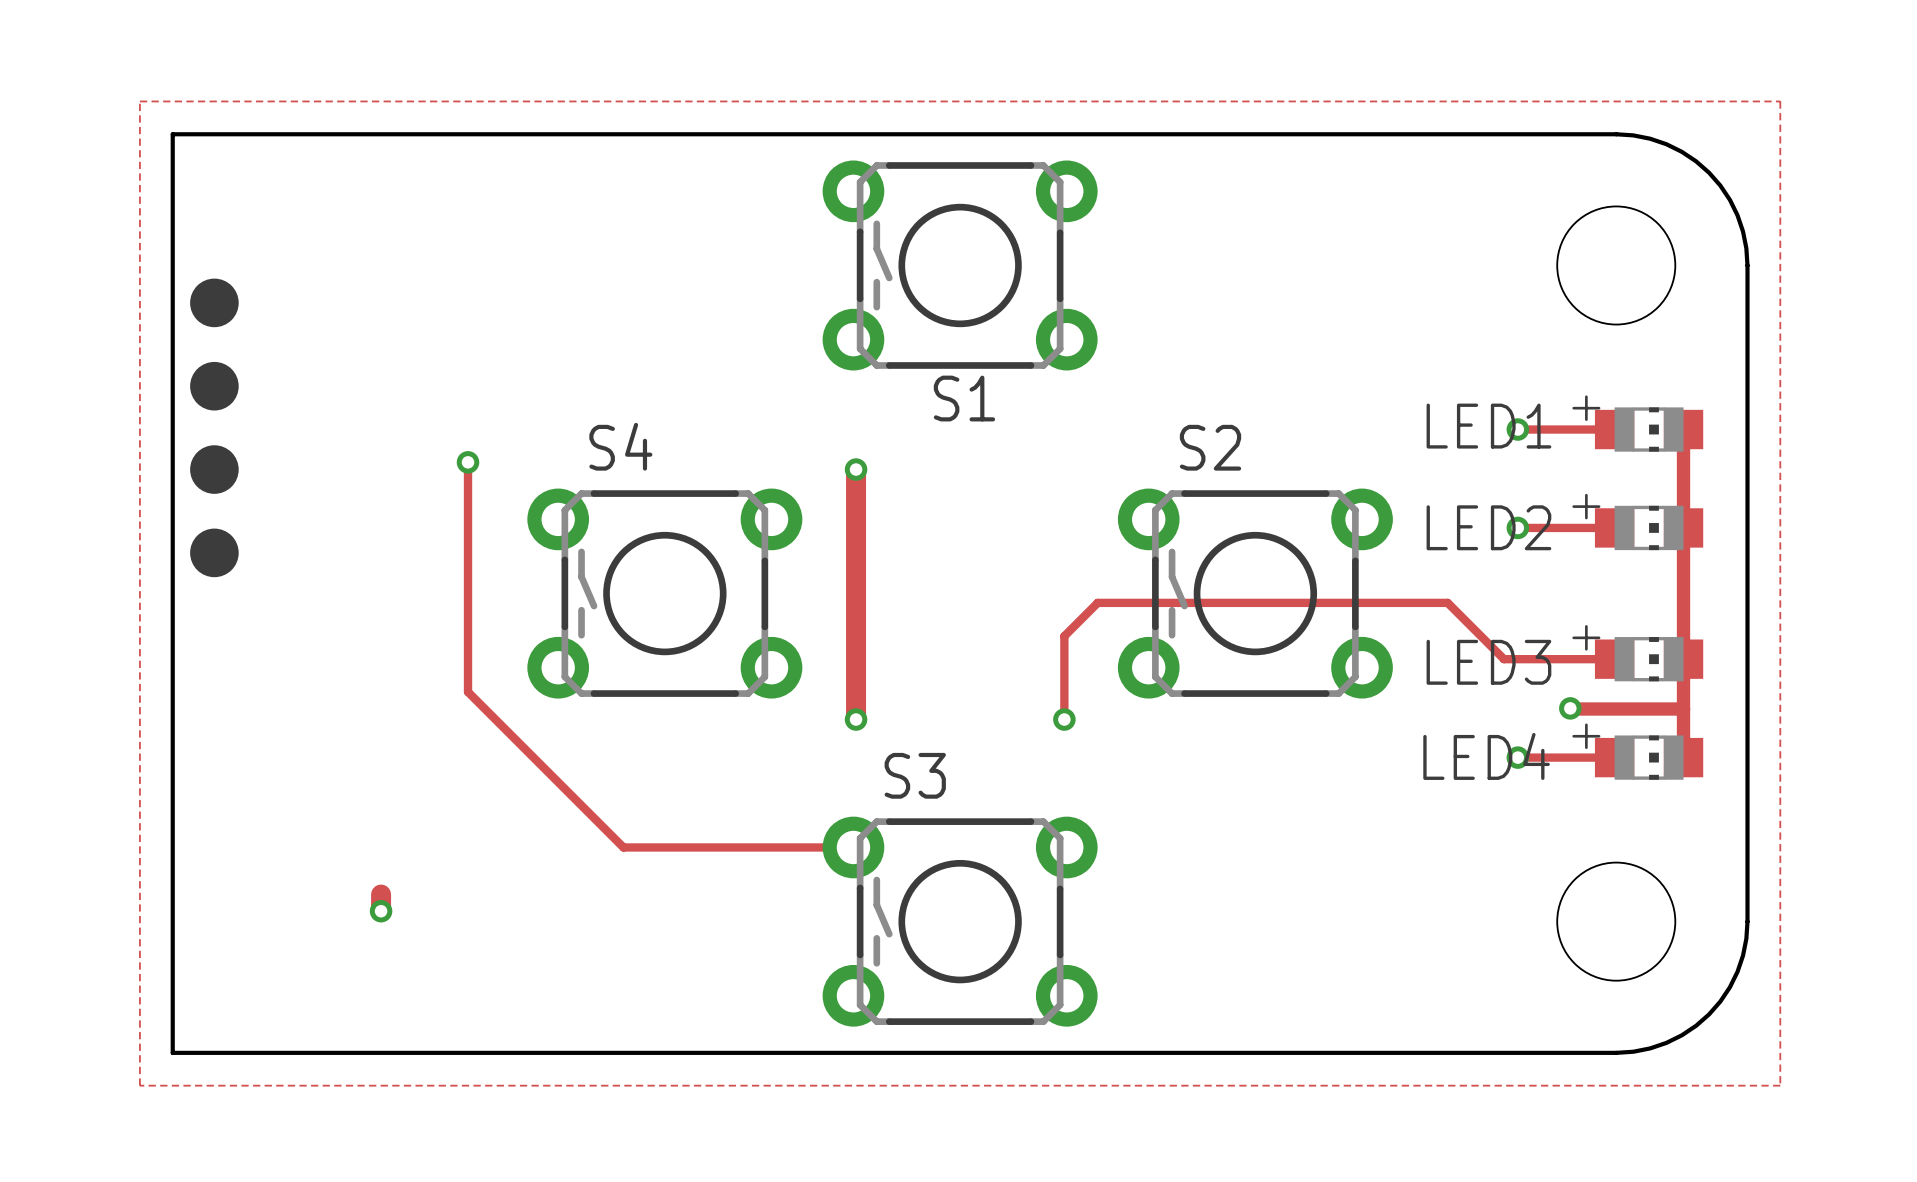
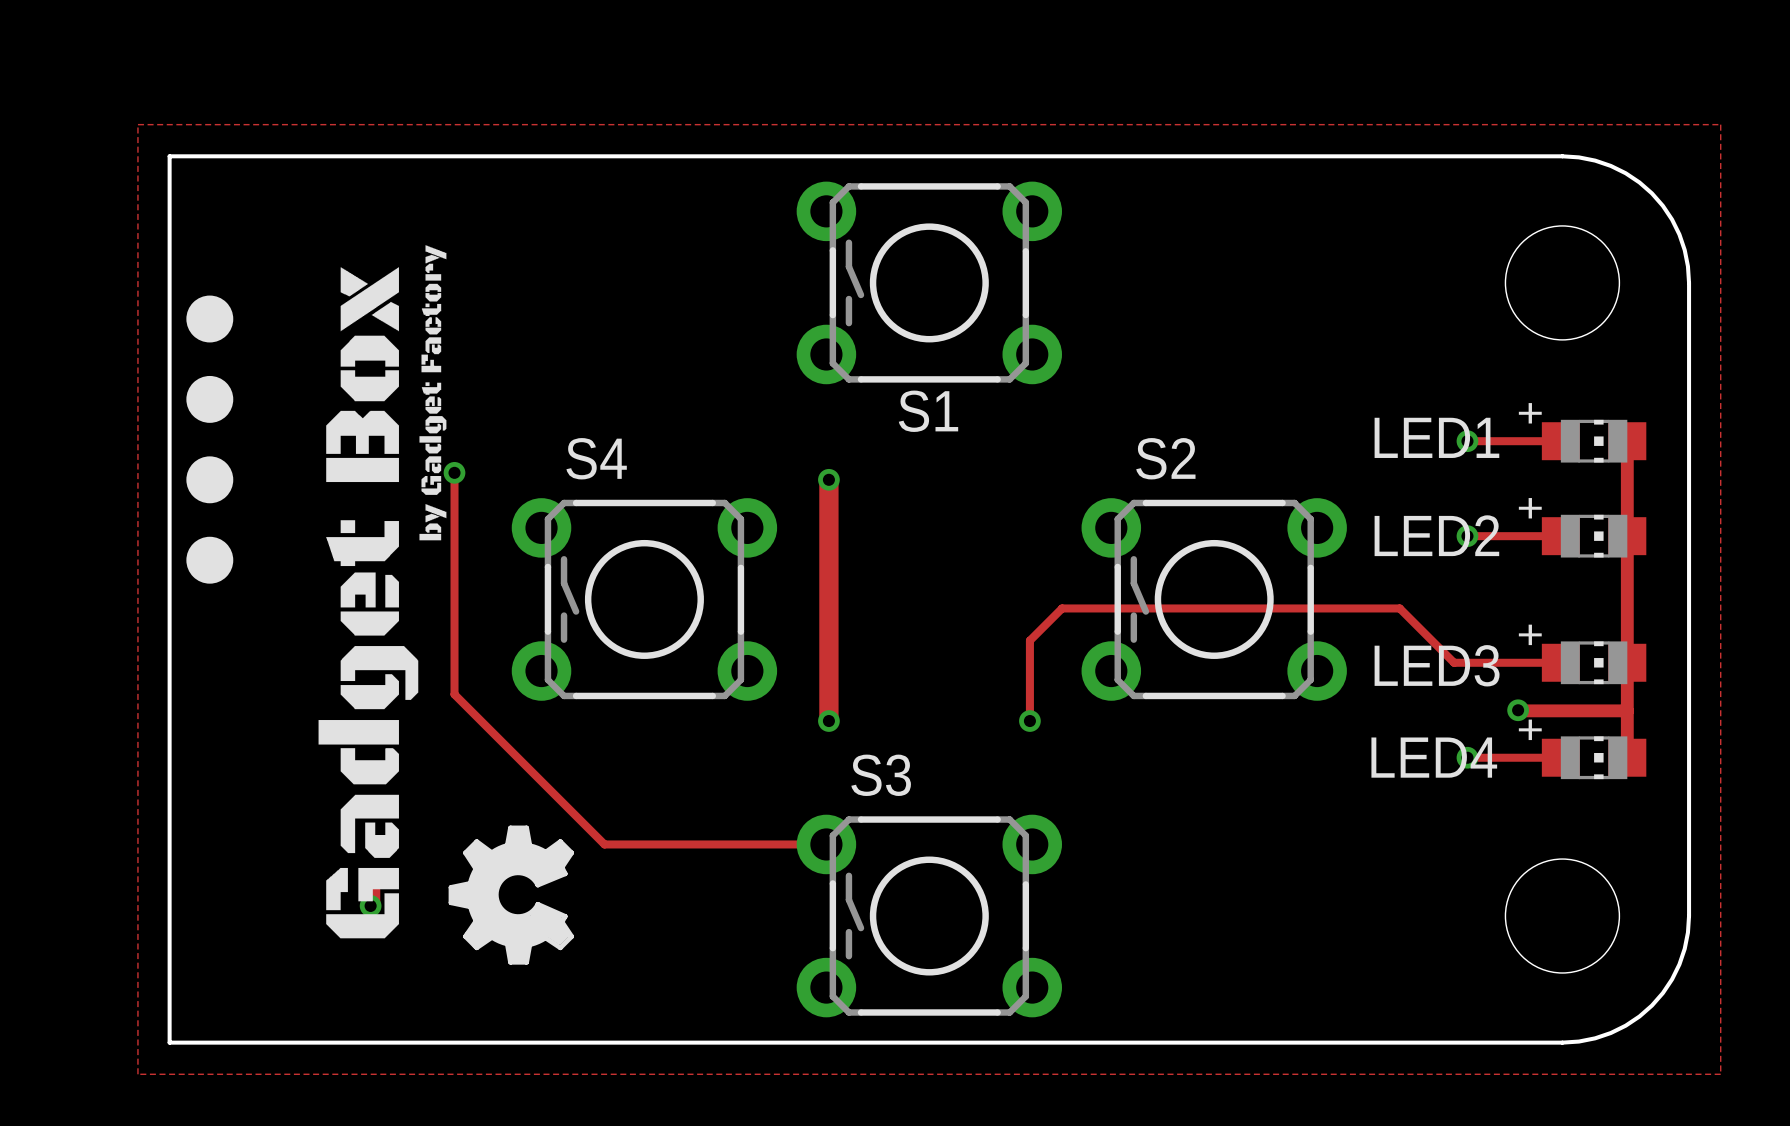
drawing: none -> [318, 245, 575, 965]

